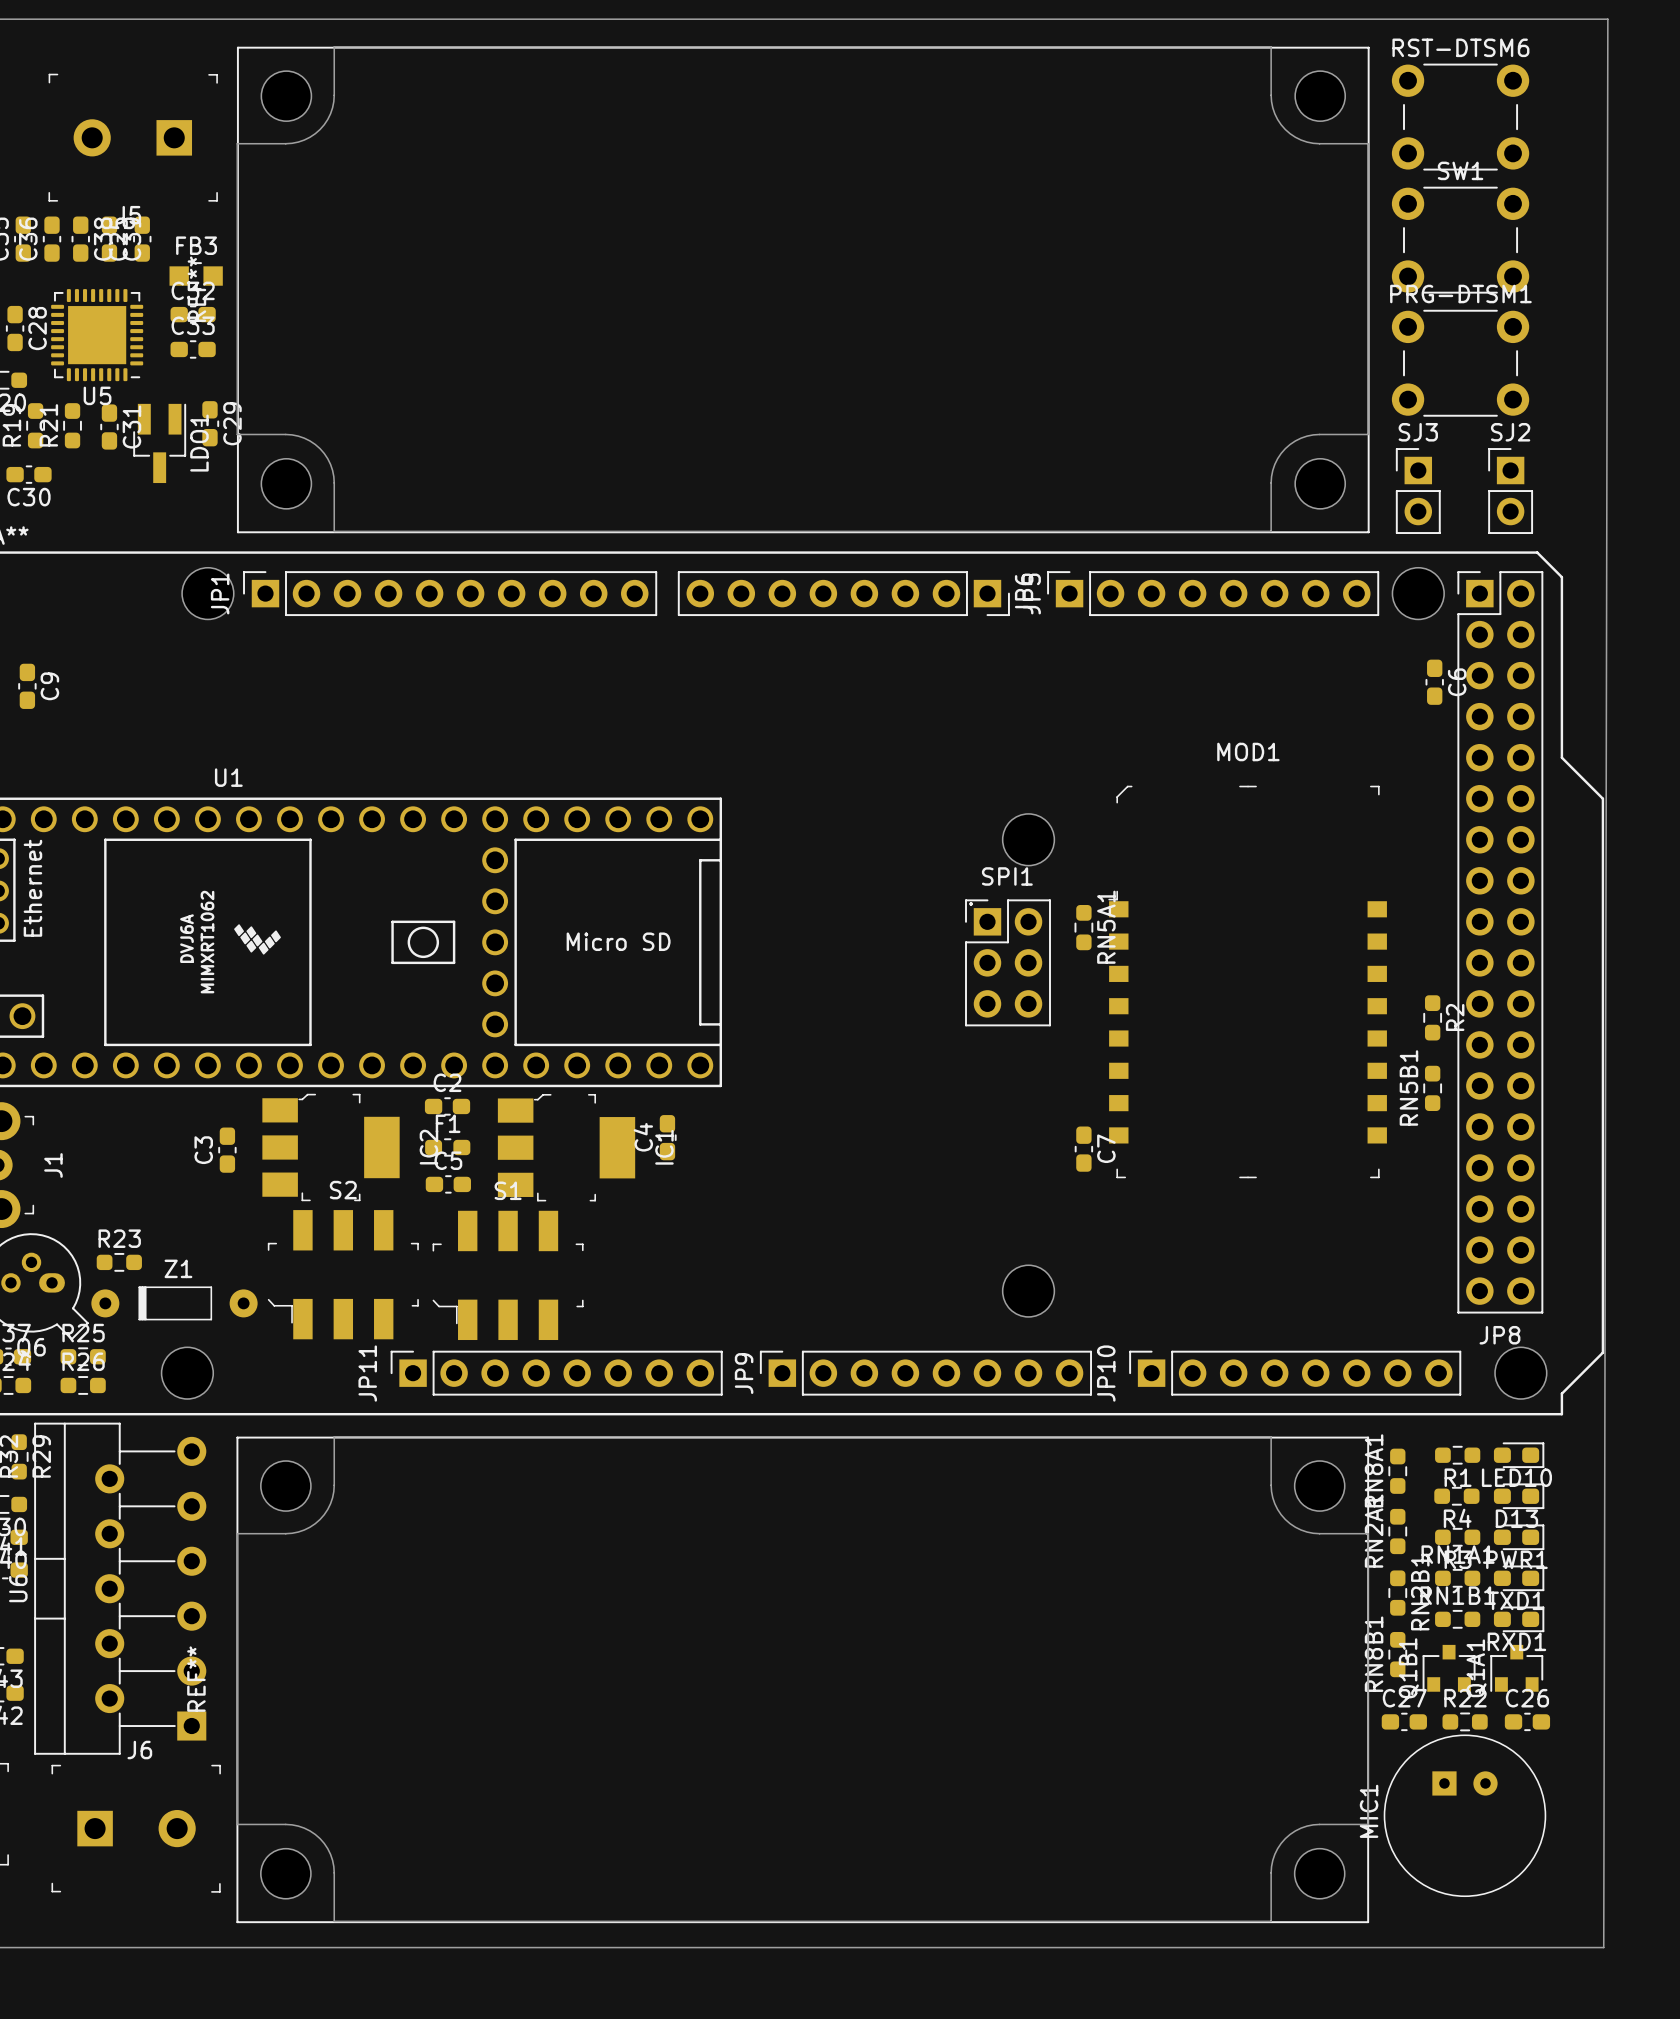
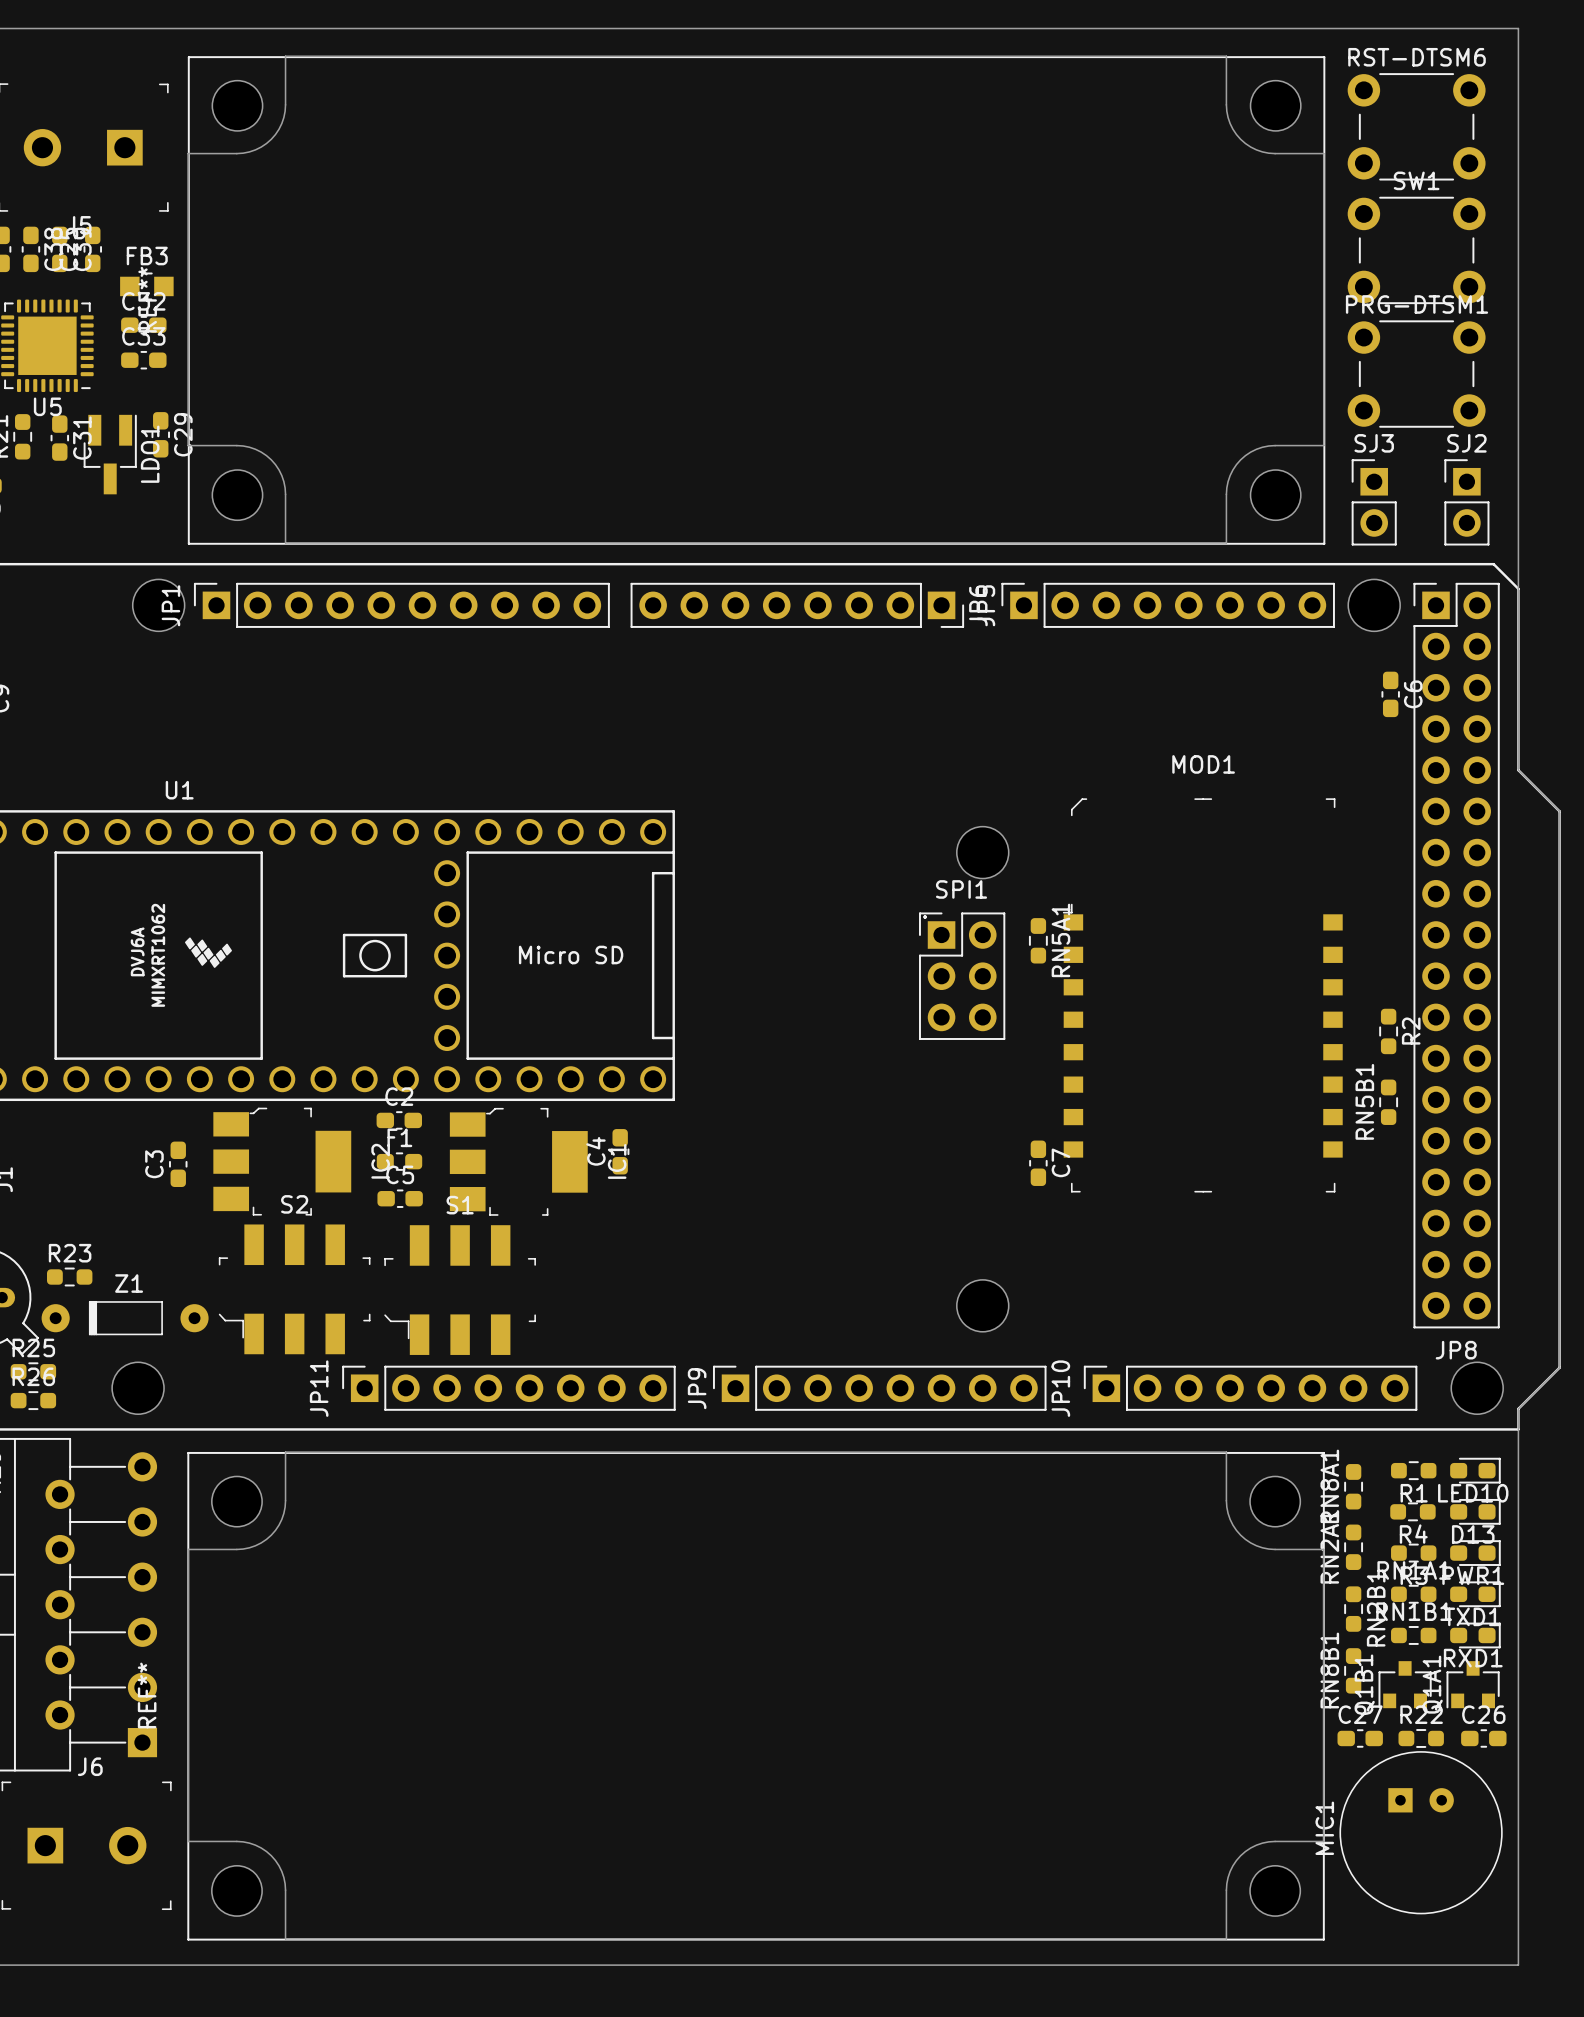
board edge: (1561, 19) (1607, 19) (1603, 1947) (1561, 1947) -> (1518, 28) (1518, 770) (1559, 811) (1559, 1367) (1518, 1408) (1518, 1965)

